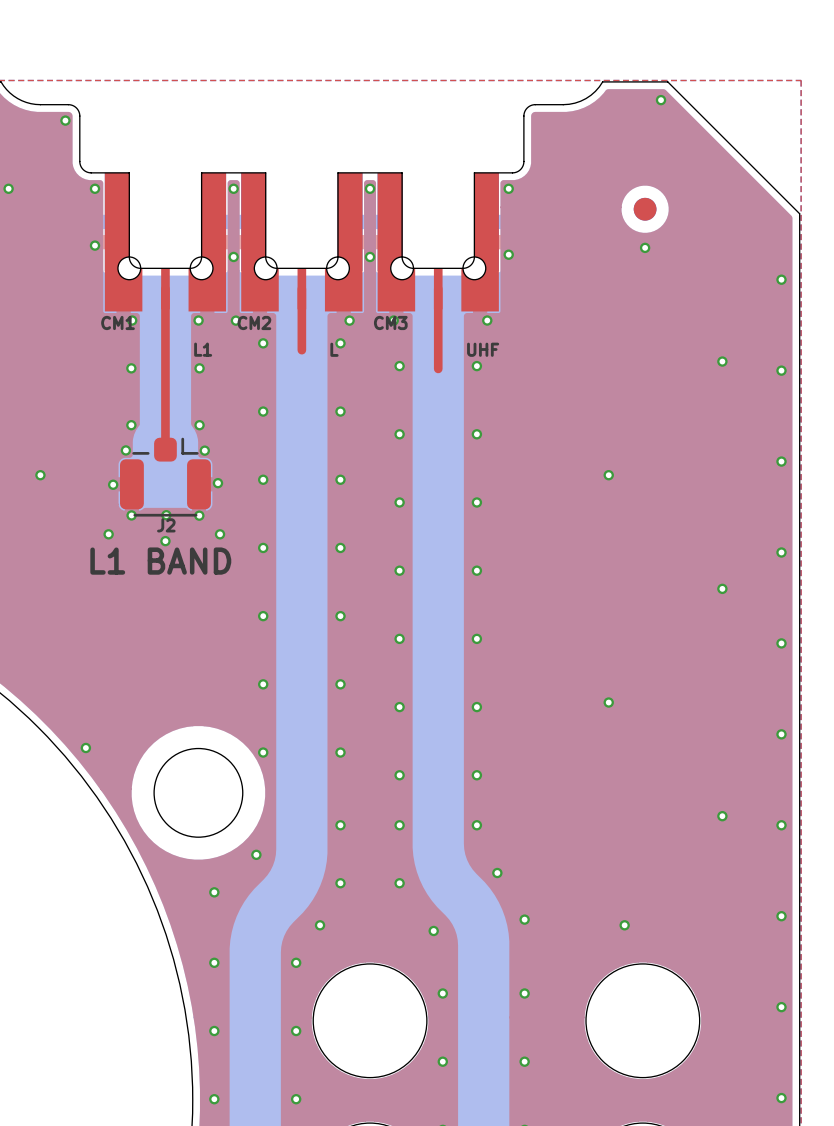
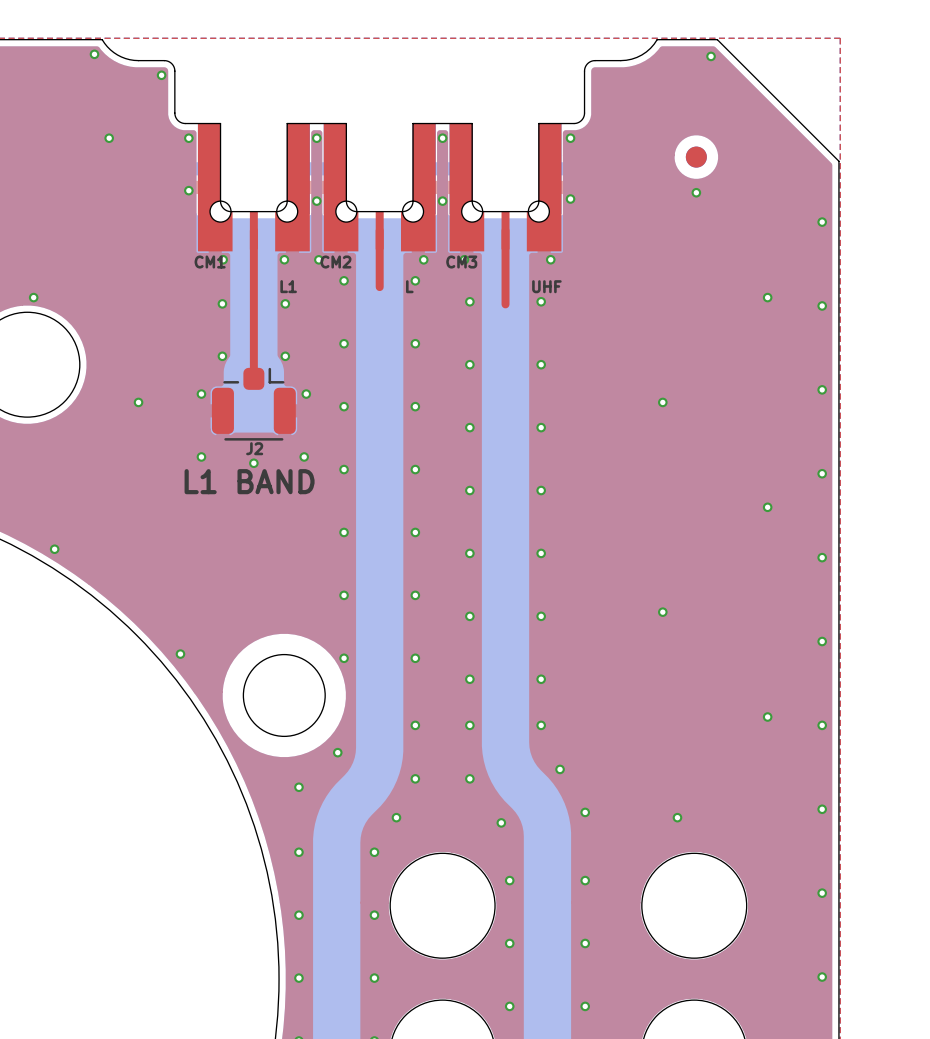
via: (125, 450) -> none
via: (204, 450) -> none
via: none -> (201, 394)
via: none -> (306, 394)
via: (217, 483) -> none
via: (113, 484) -> none
via: (131, 515) -> none
via: (166, 515) -> none
via: (199, 515) -> none

